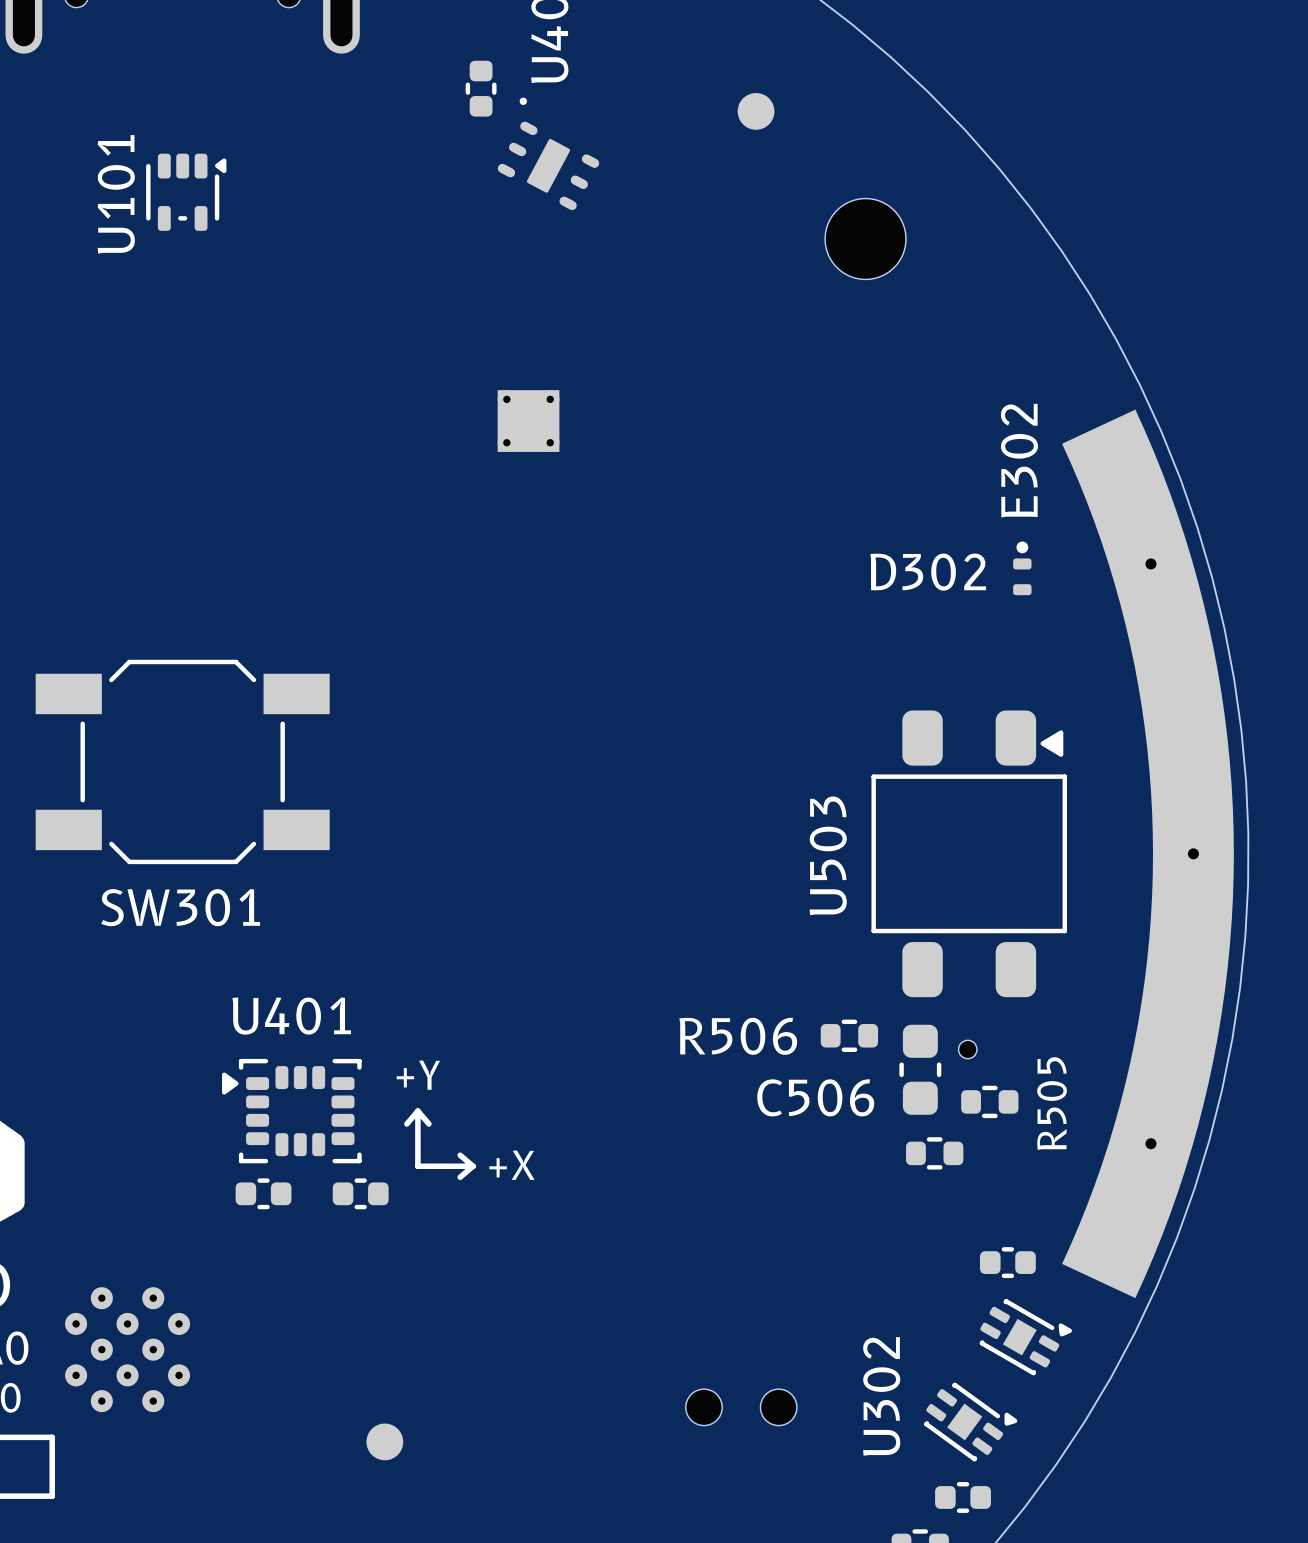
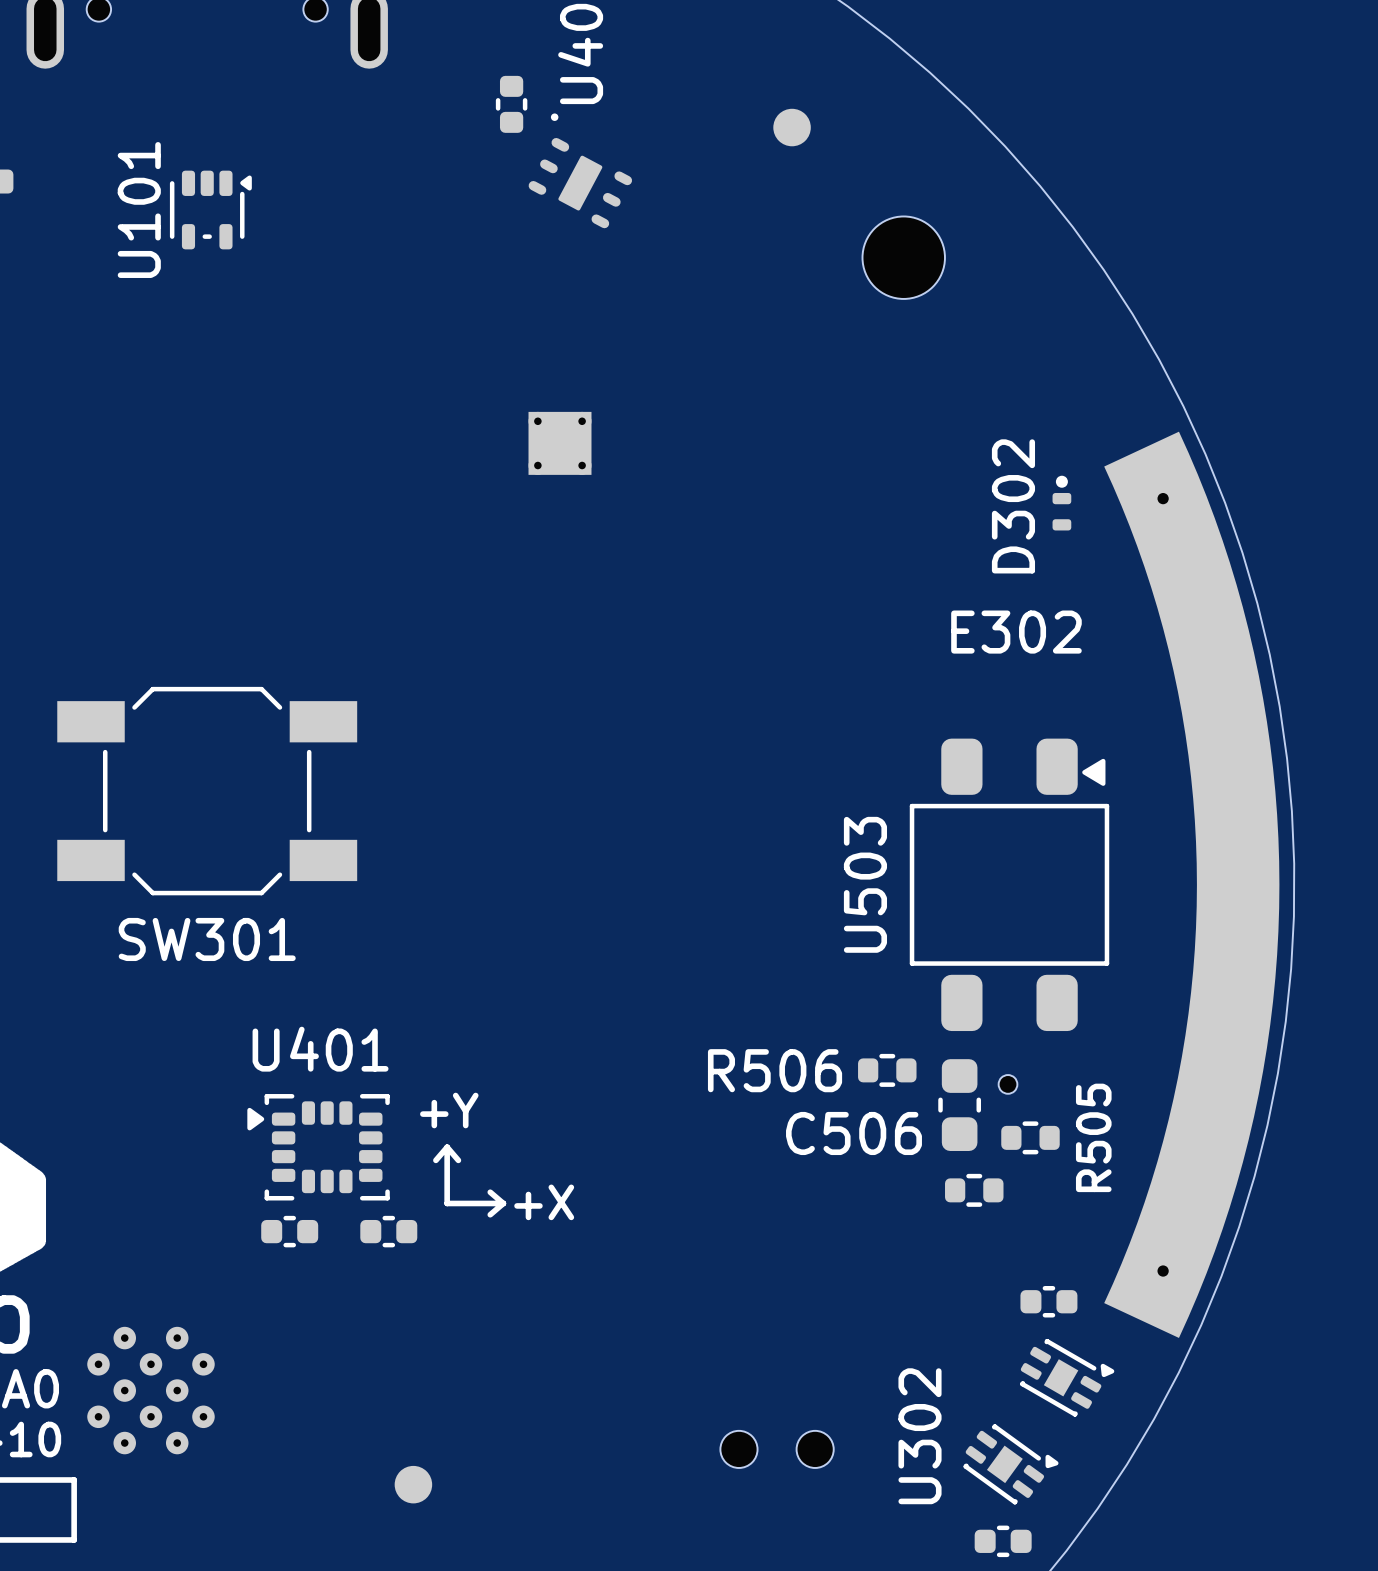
E302 footprint: [1062, 409, 1234, 1299] -> [1104, 431, 1280, 1338]
E302 name position: E302 (1019, 460) -> E302 (1016, 632)
D302 position: (1022, 568) -> (1061, 503)
D302 name rotation: 0° (928, 572) -> 90° counterclockwise (1013, 506)

